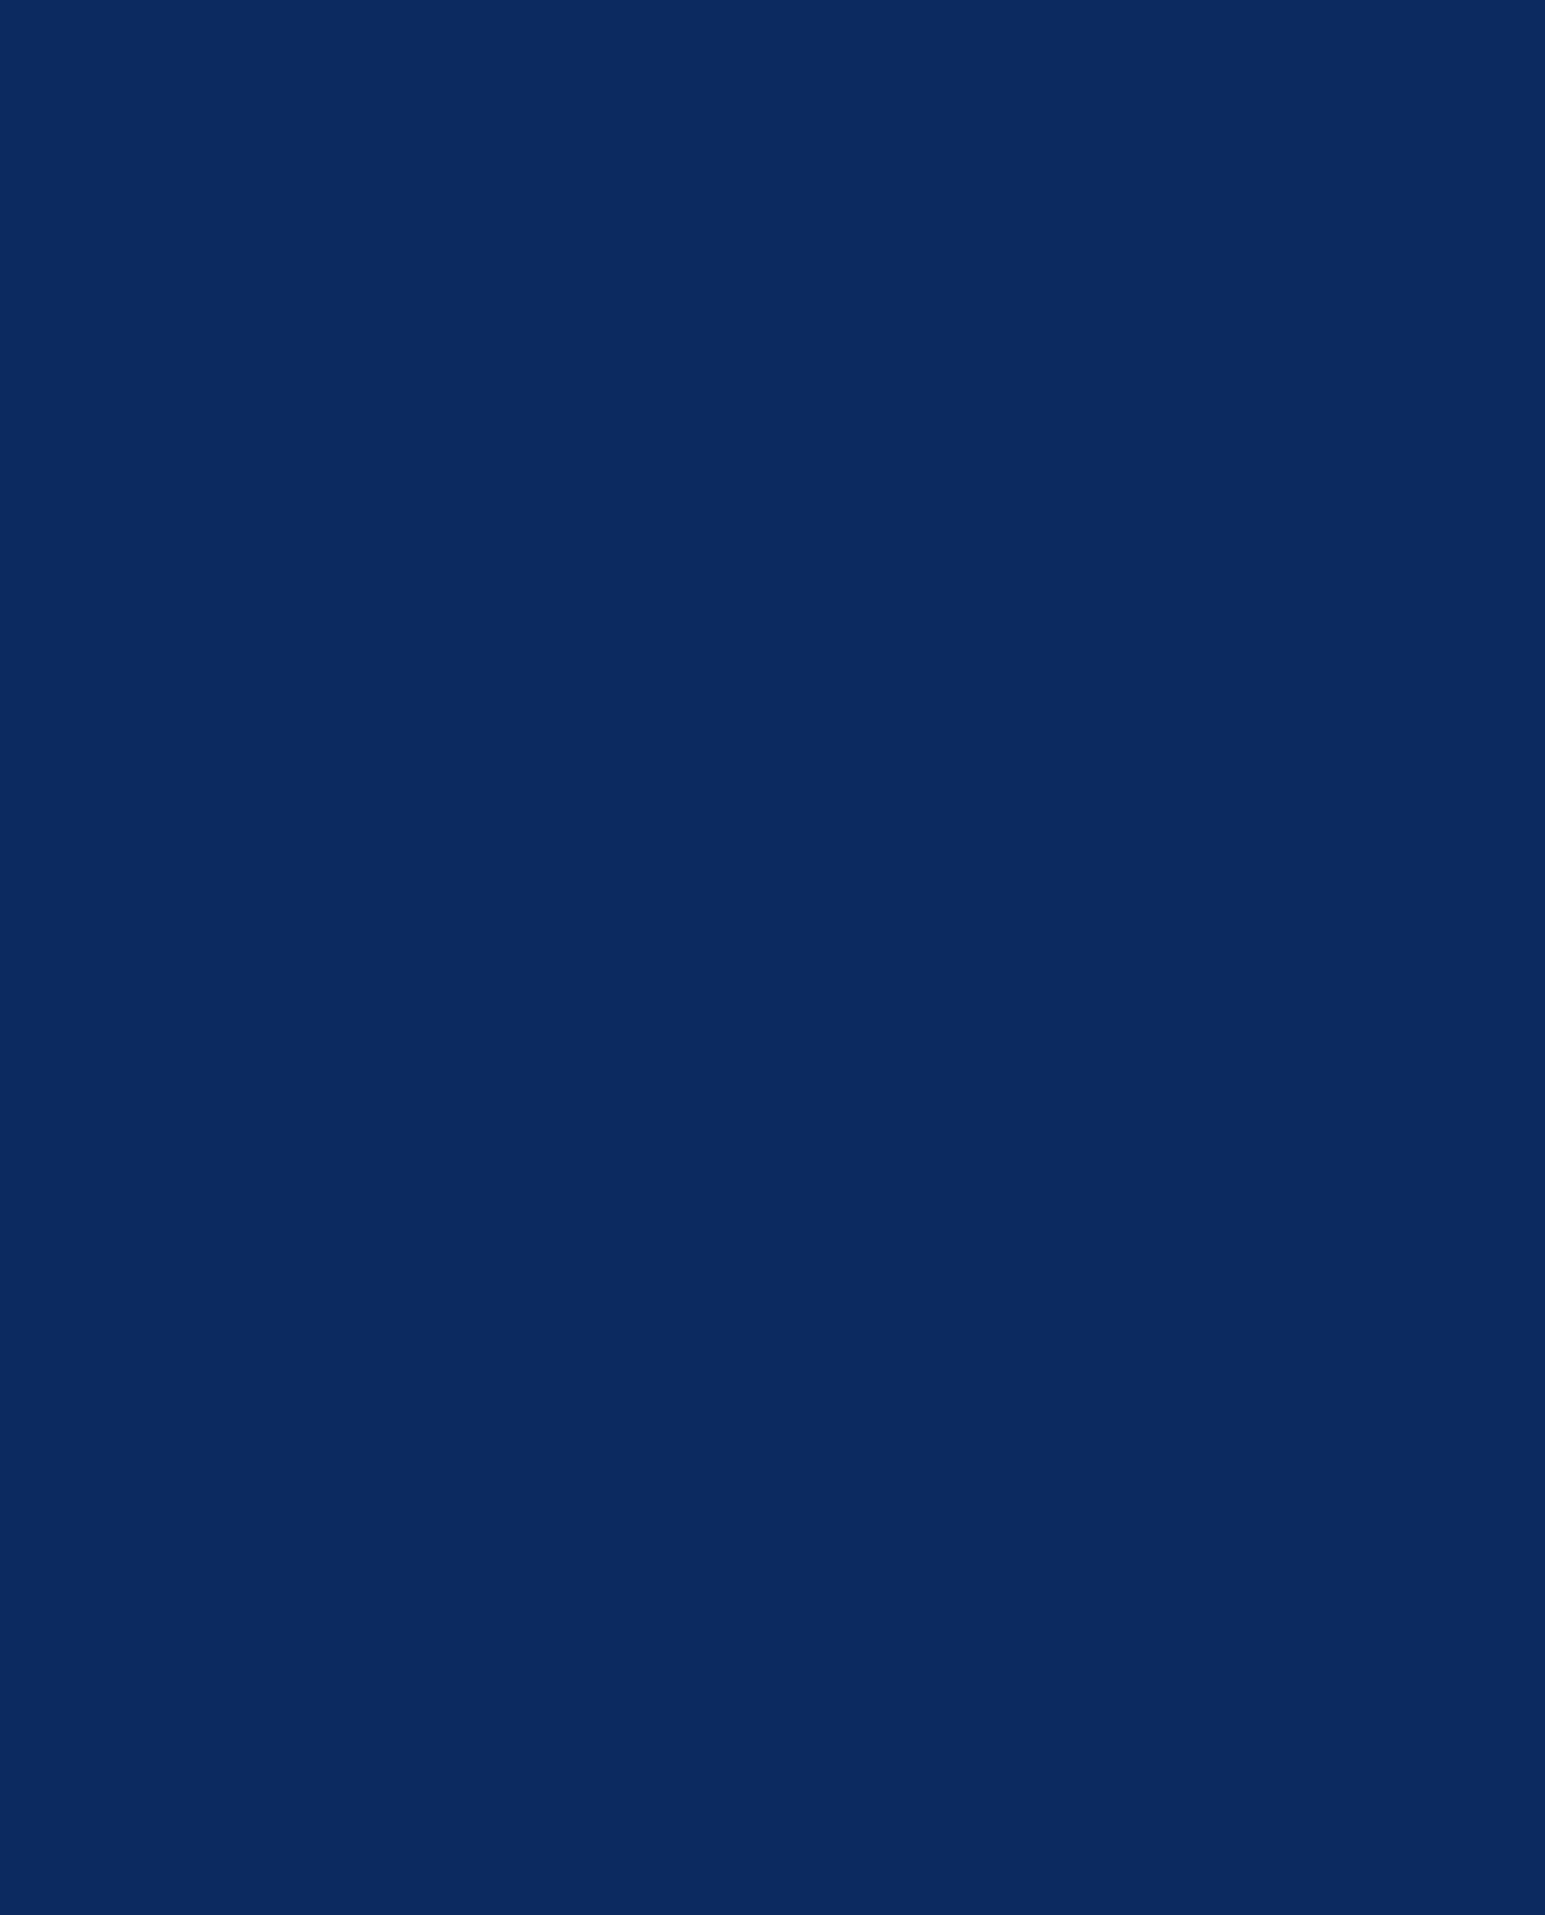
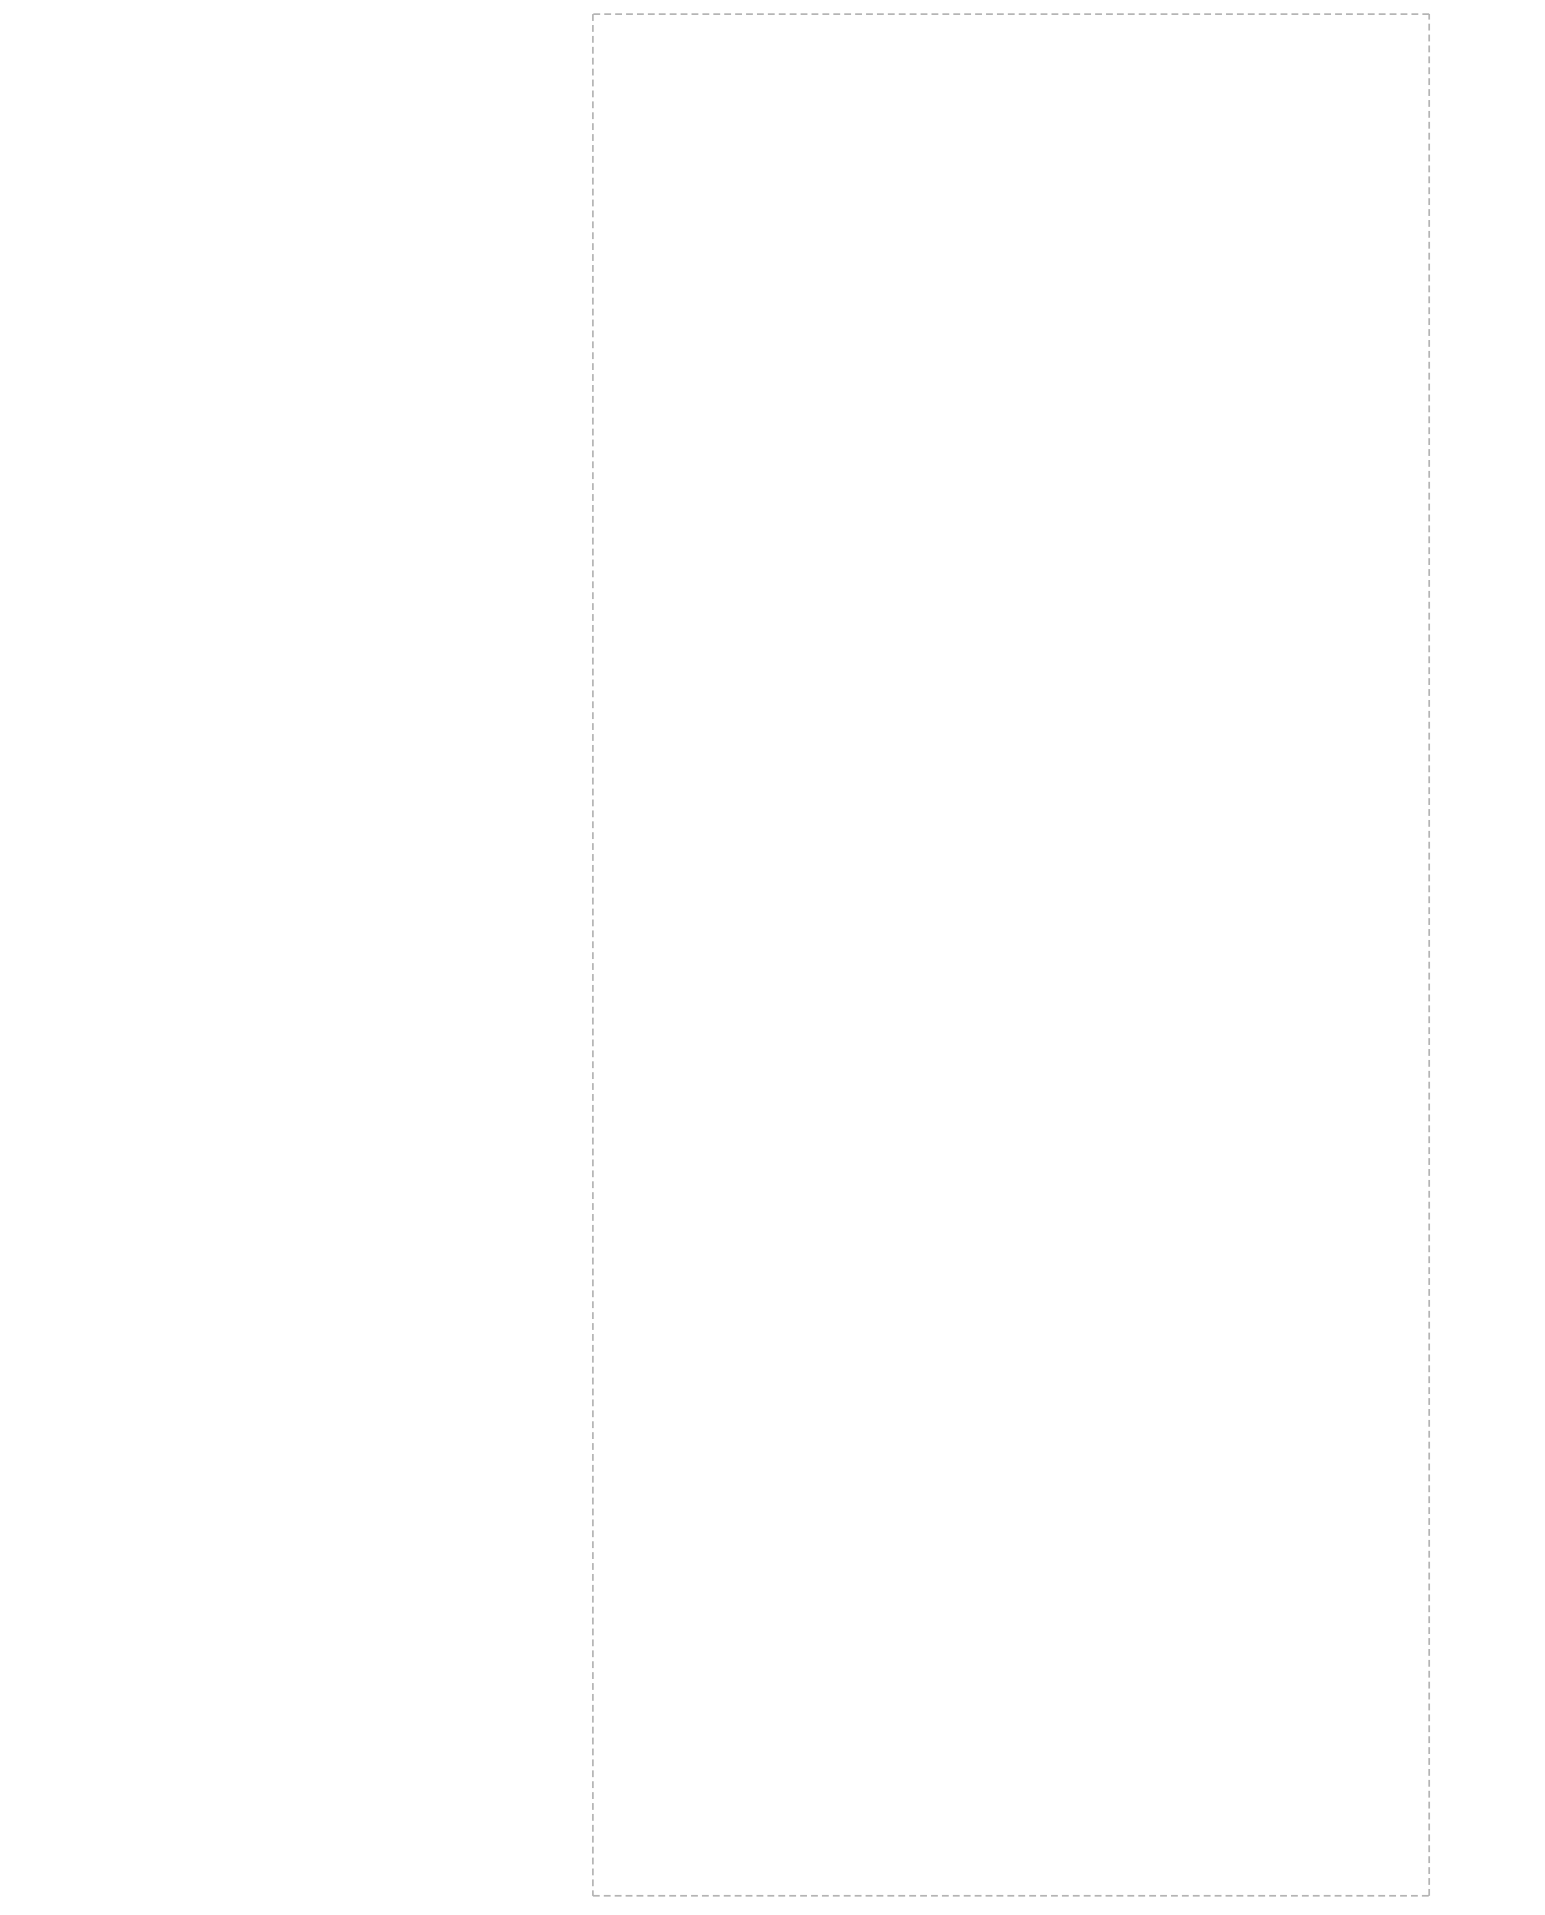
zone outline: none -> (592, 14) (592, 1895) (1429, 1895) (1429, 14) (592, 14)

